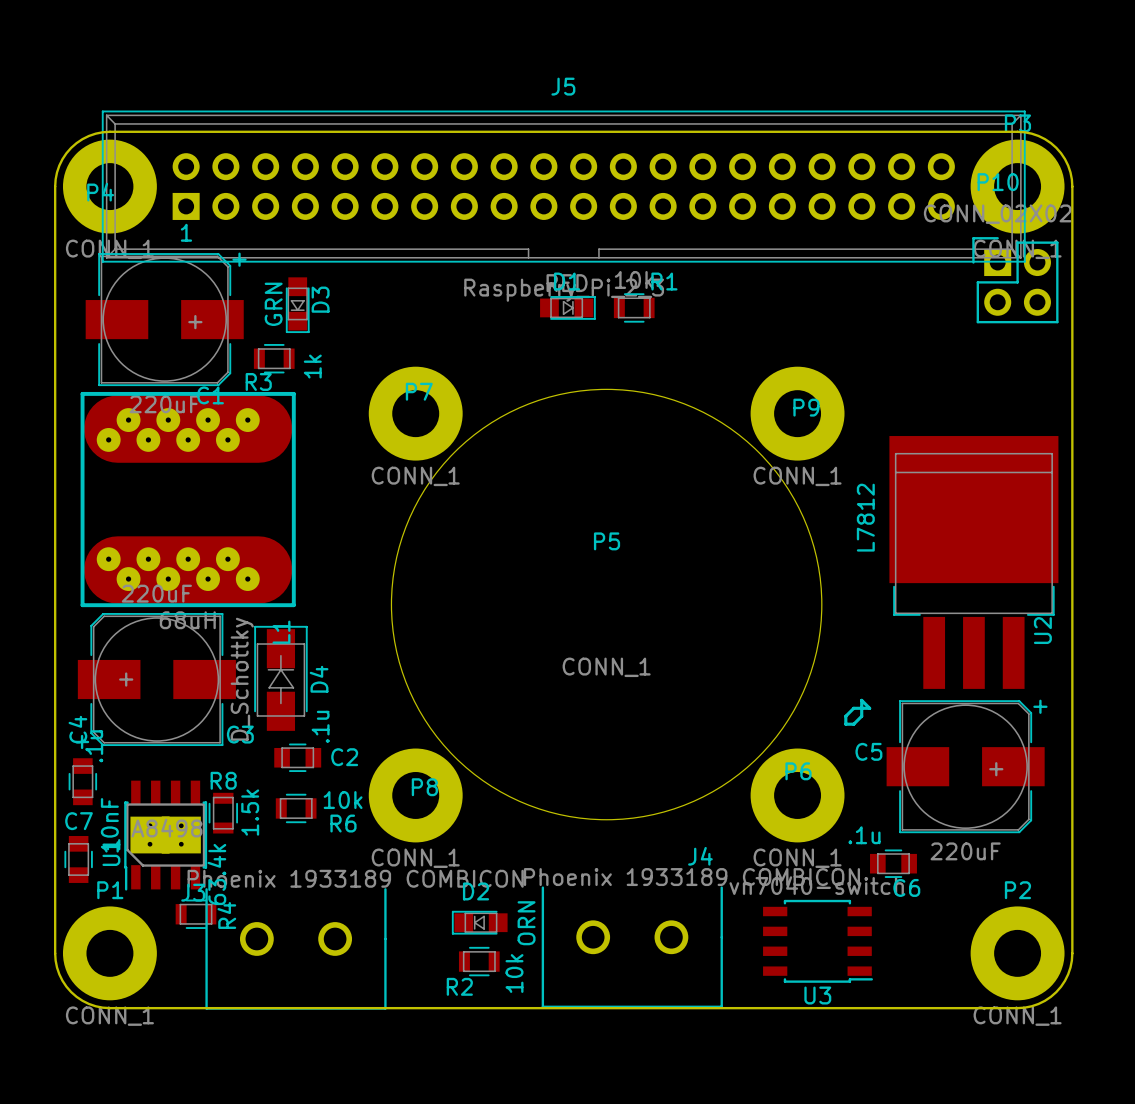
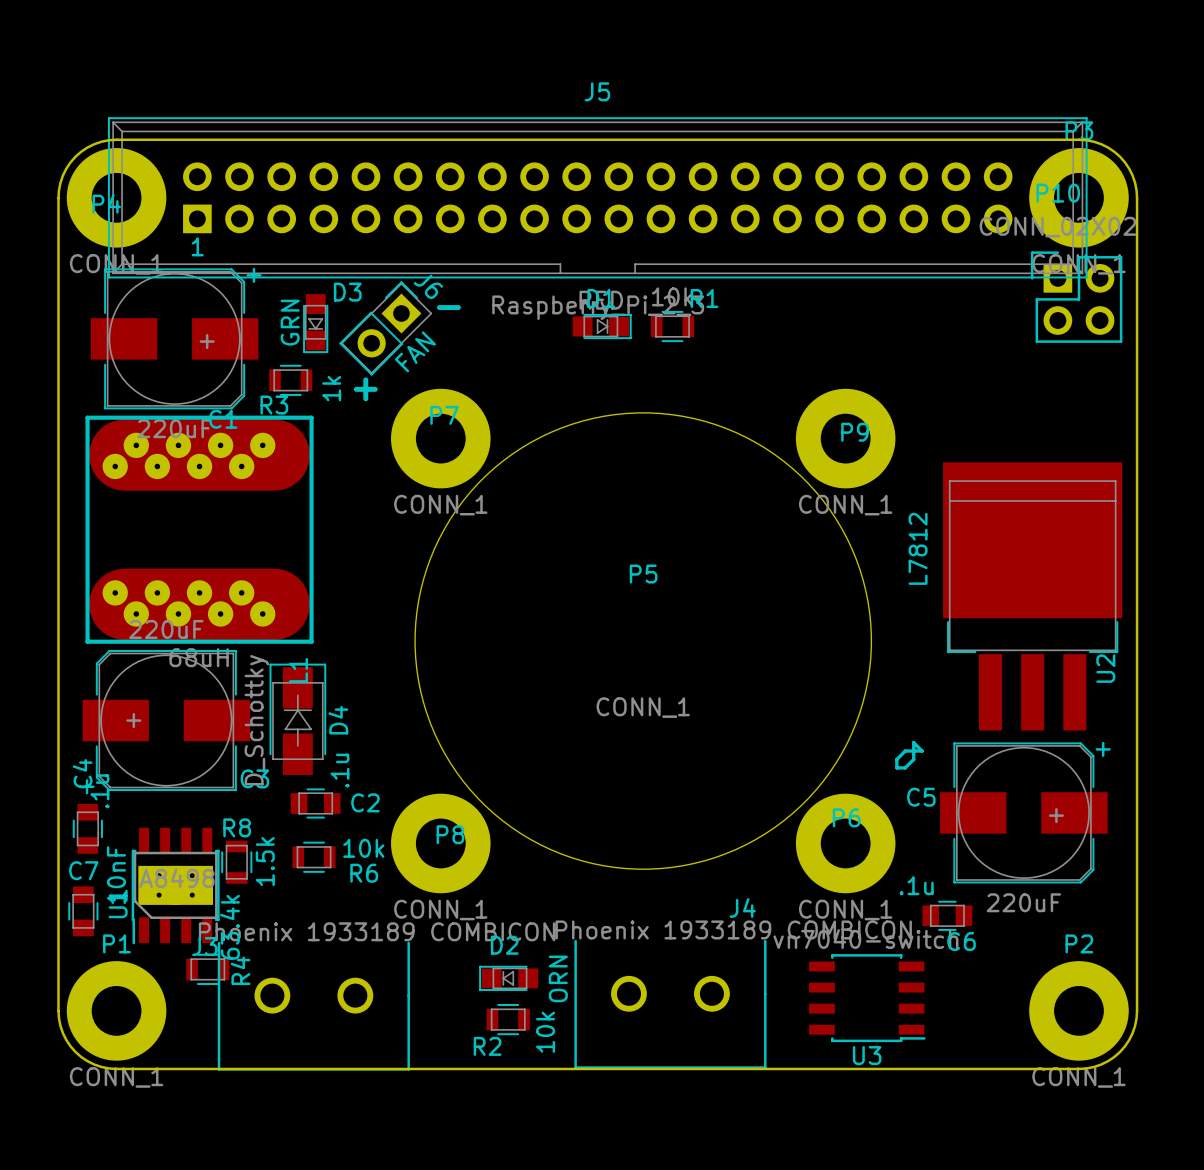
text: none -> - (448, 307)
D3 name rotation: 0° (320, 299) -> 90° clockwise (347, 292)
J6: none -> FAN (385, 328)
text: none -> + (365, 389)

